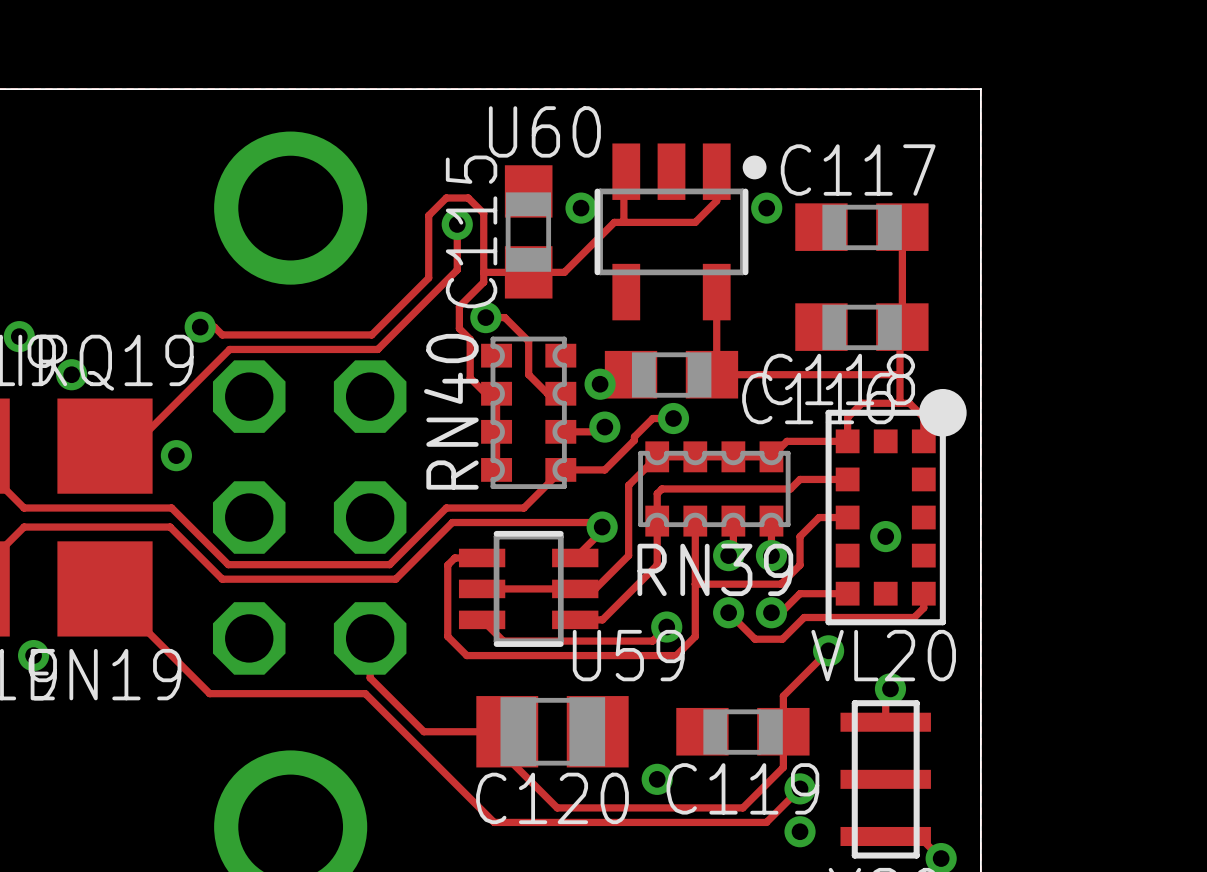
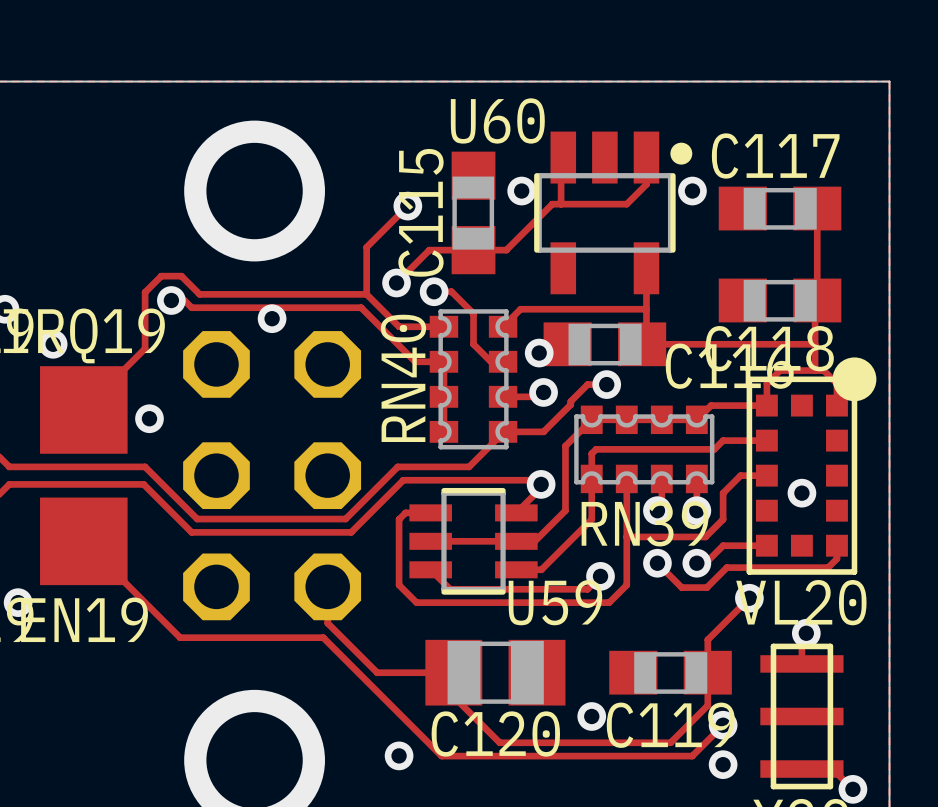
track: (457, 224) (457, 269) (377, 349) (229, 349) (133, 446) (105, 446) -> (366, 294) (199, 294) (181, 276) (161, 276) (145, 292) (145, 348) (83, 409)
track: none -> (407, 206) (366, 247) (366, 294)
track: none -> (432, 250) (429, 250) (396, 282)
via: none -> (396, 282)
track: none -> (366, 294) (399, 326) (443, 326)
track: (371, 334) (428, 278) (428, 215) (446, 198) (468, 198) (483, 213) (483, 282) (459, 306) (459, 328) (470, 339) (470, 378) (485, 393) -> (329, 307) (361, 307) (415, 361) (434, 361)
track: none -> (646, 309) (520, 309) (503, 326)
via: none -> (272, 318)
via: none -> (399, 755)

